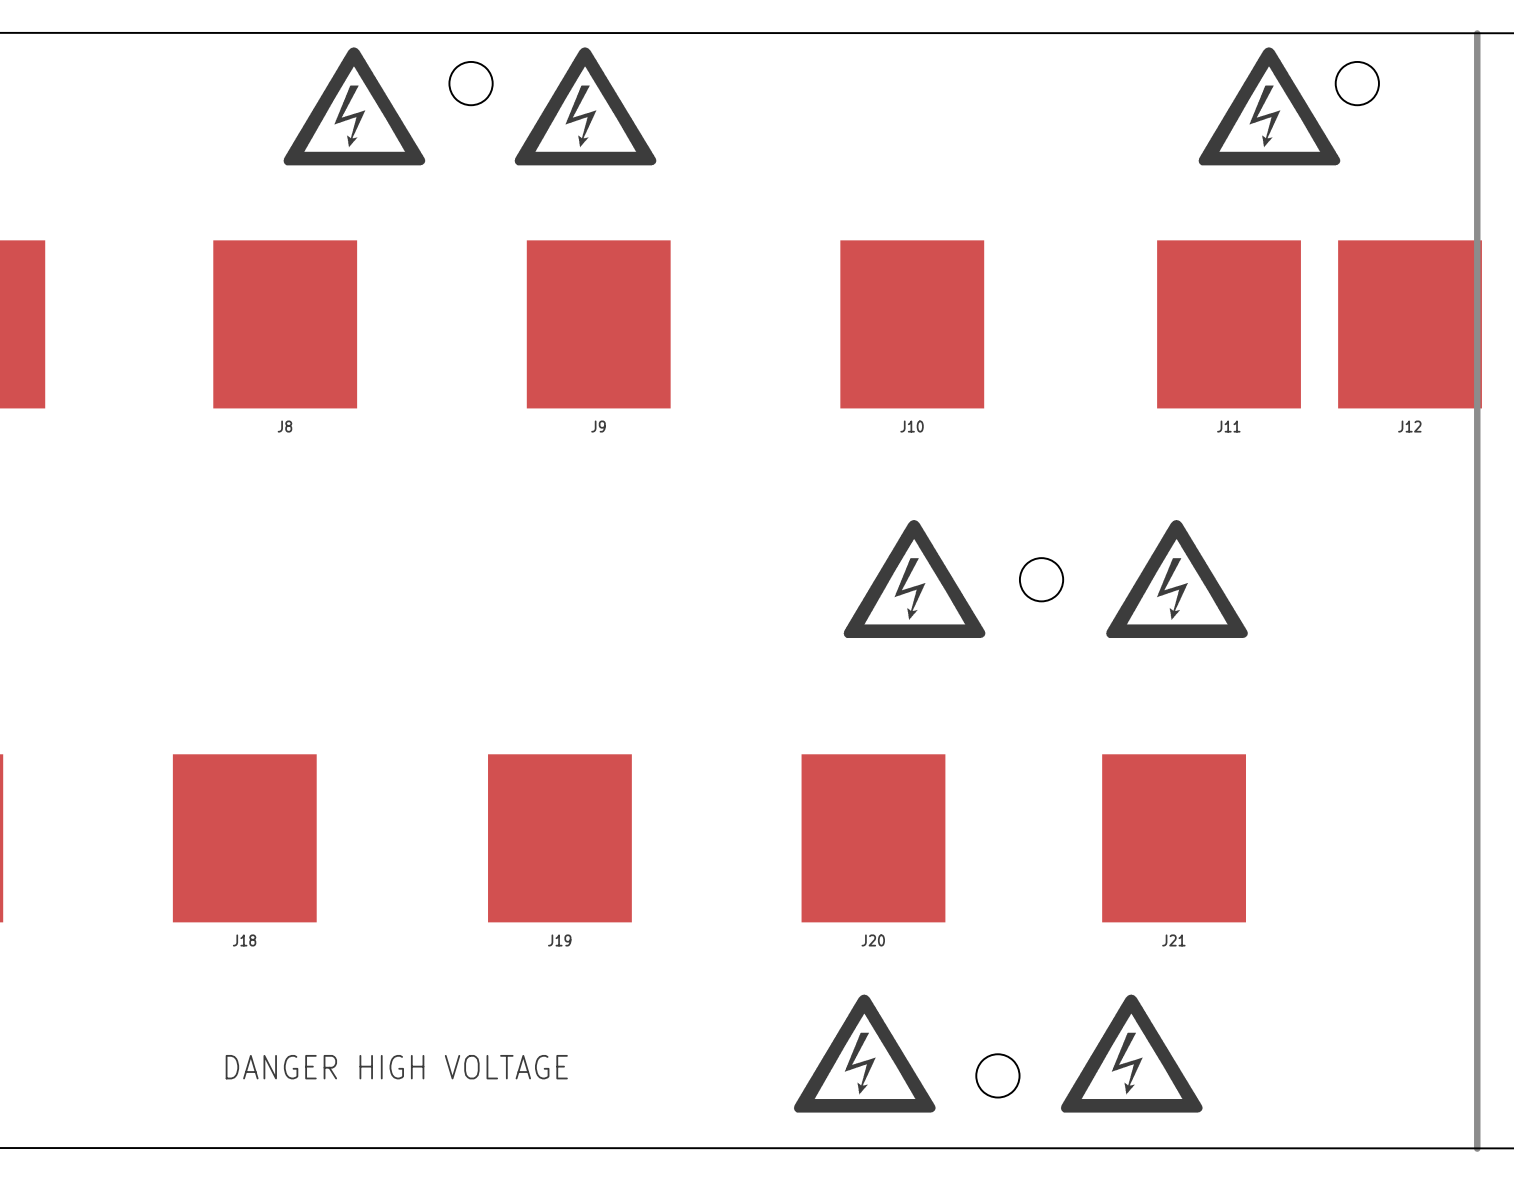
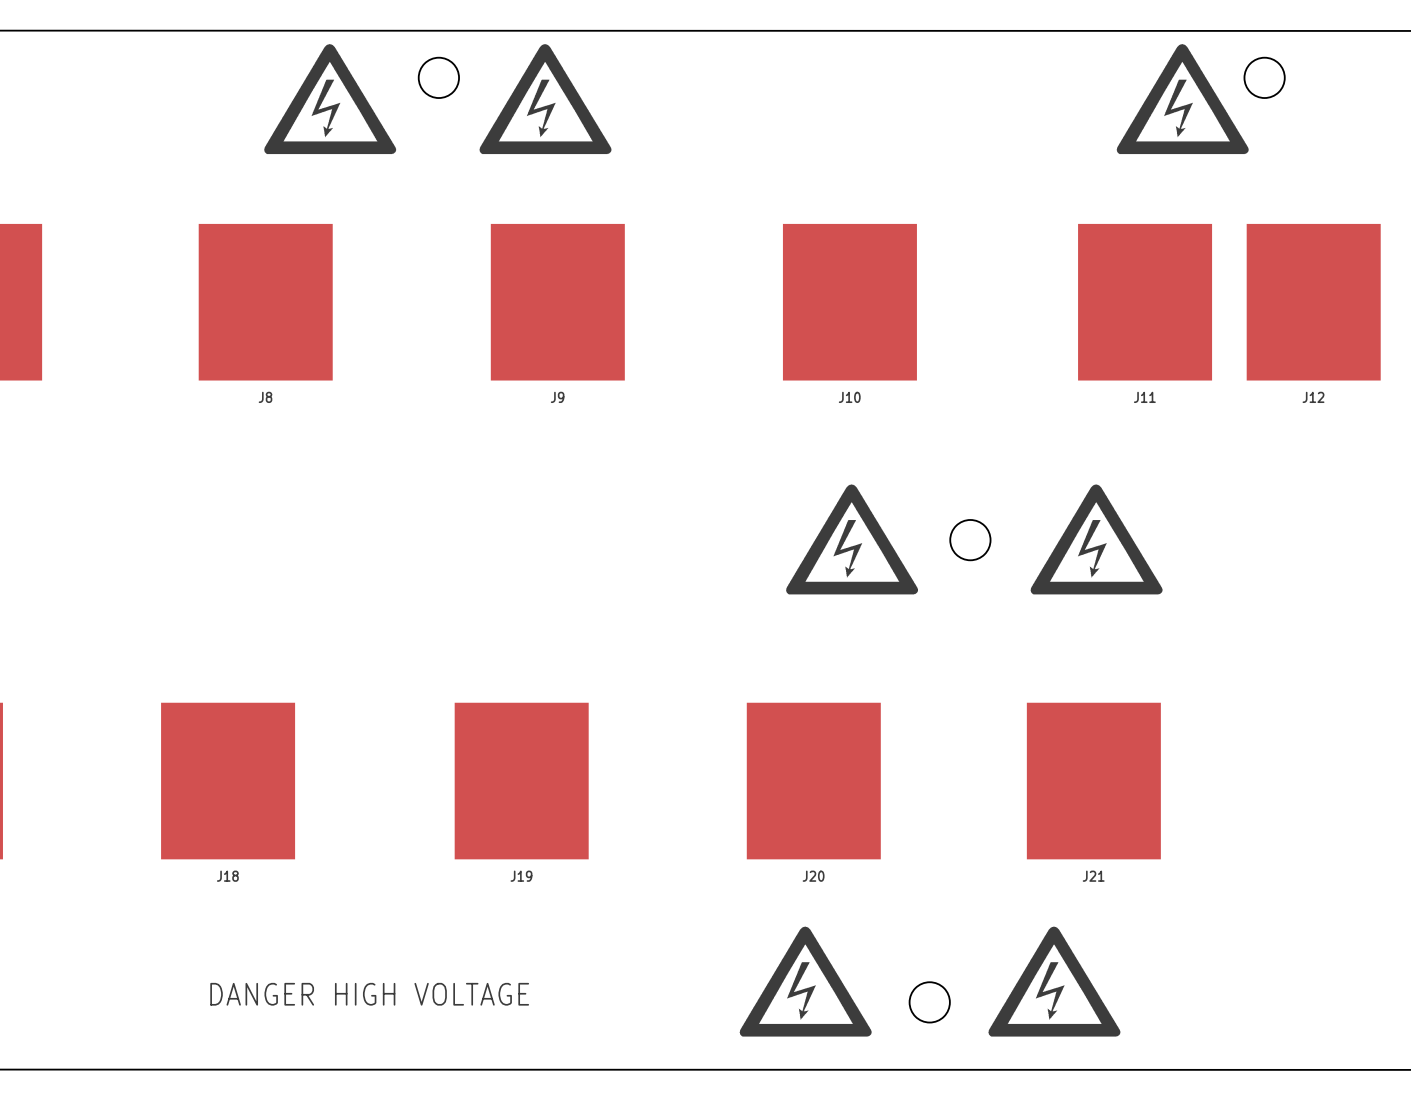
line: (1477, 33) (1477, 1148) -> none

